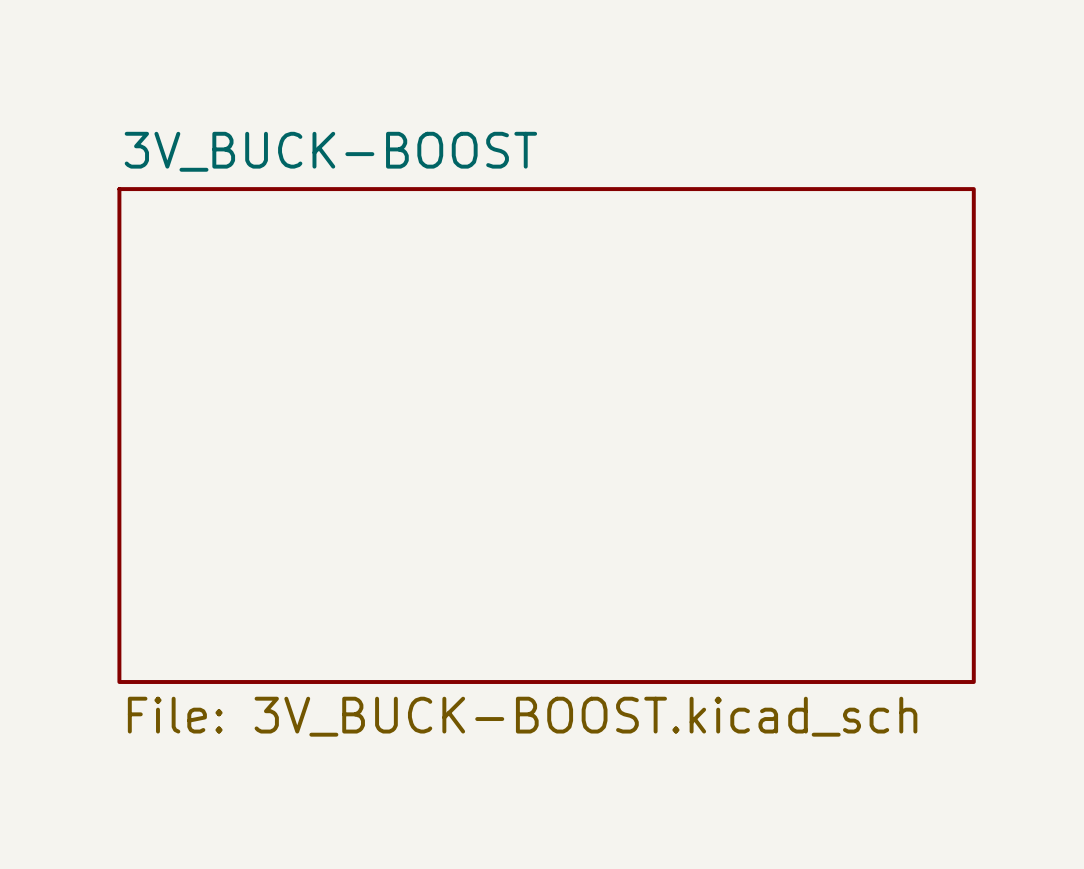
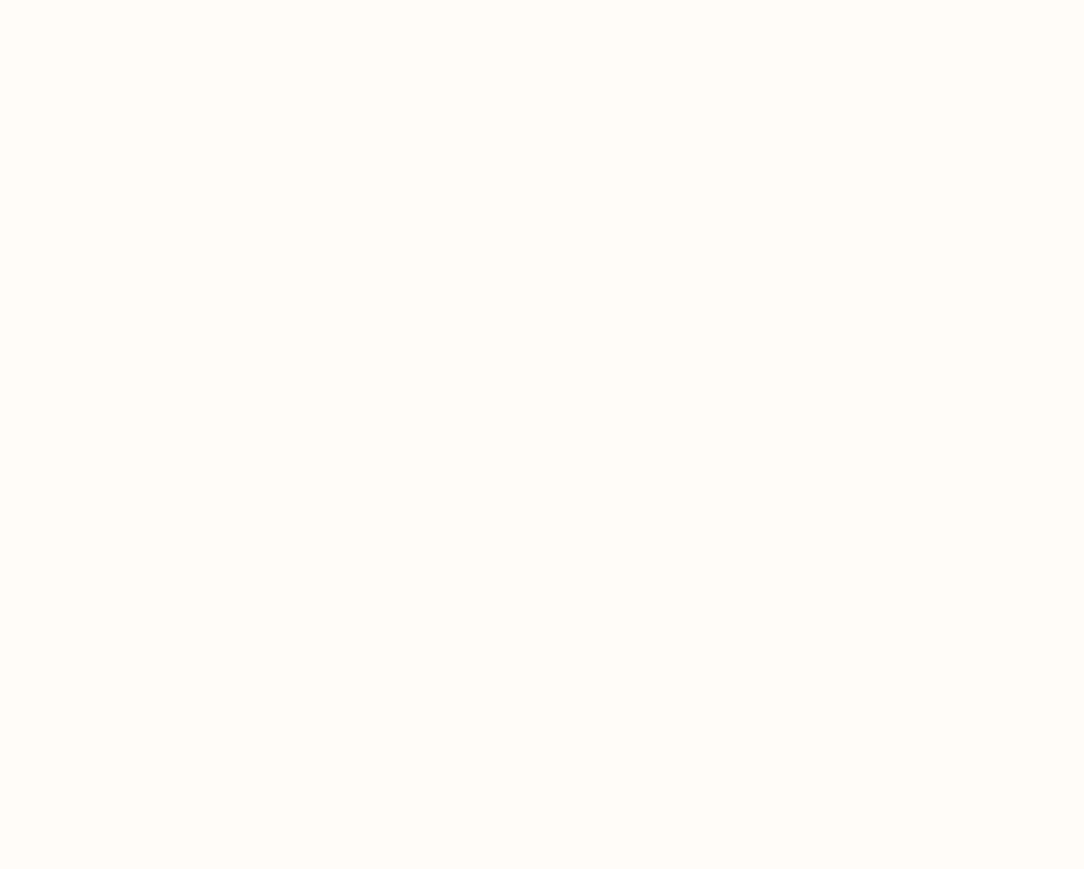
sheet 3V_BUCK-BOOST: File: 3V_BUCK-BOOST.kicad_sch (546, 435) -> none

